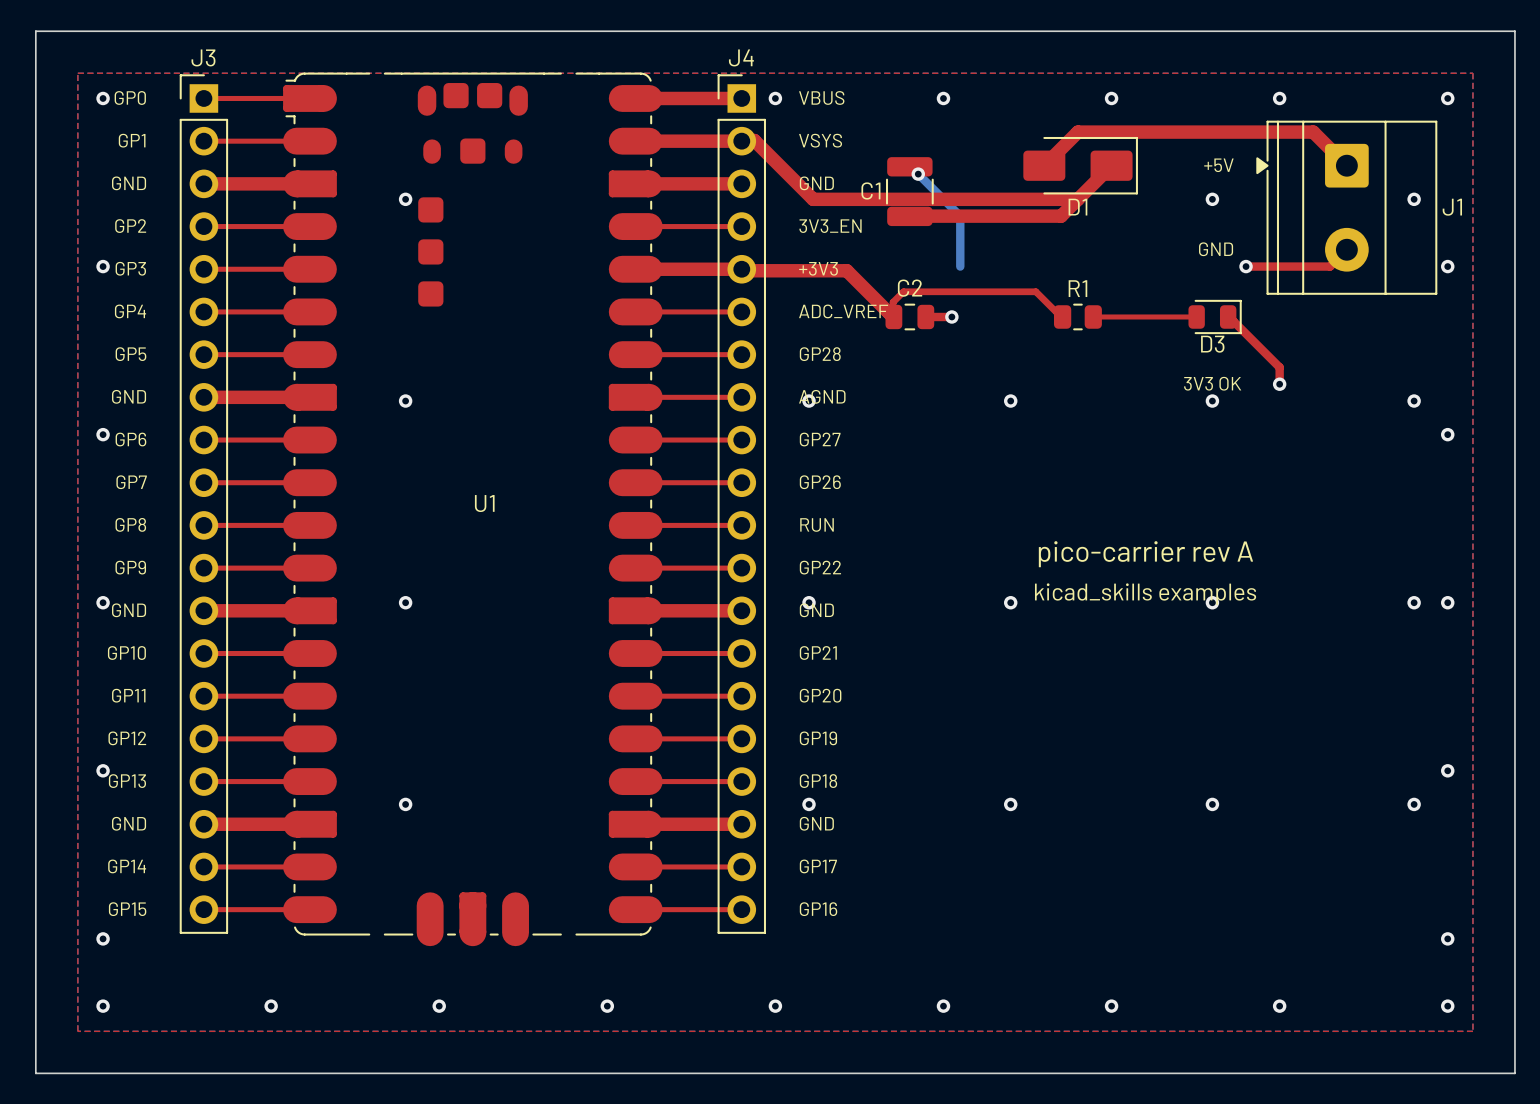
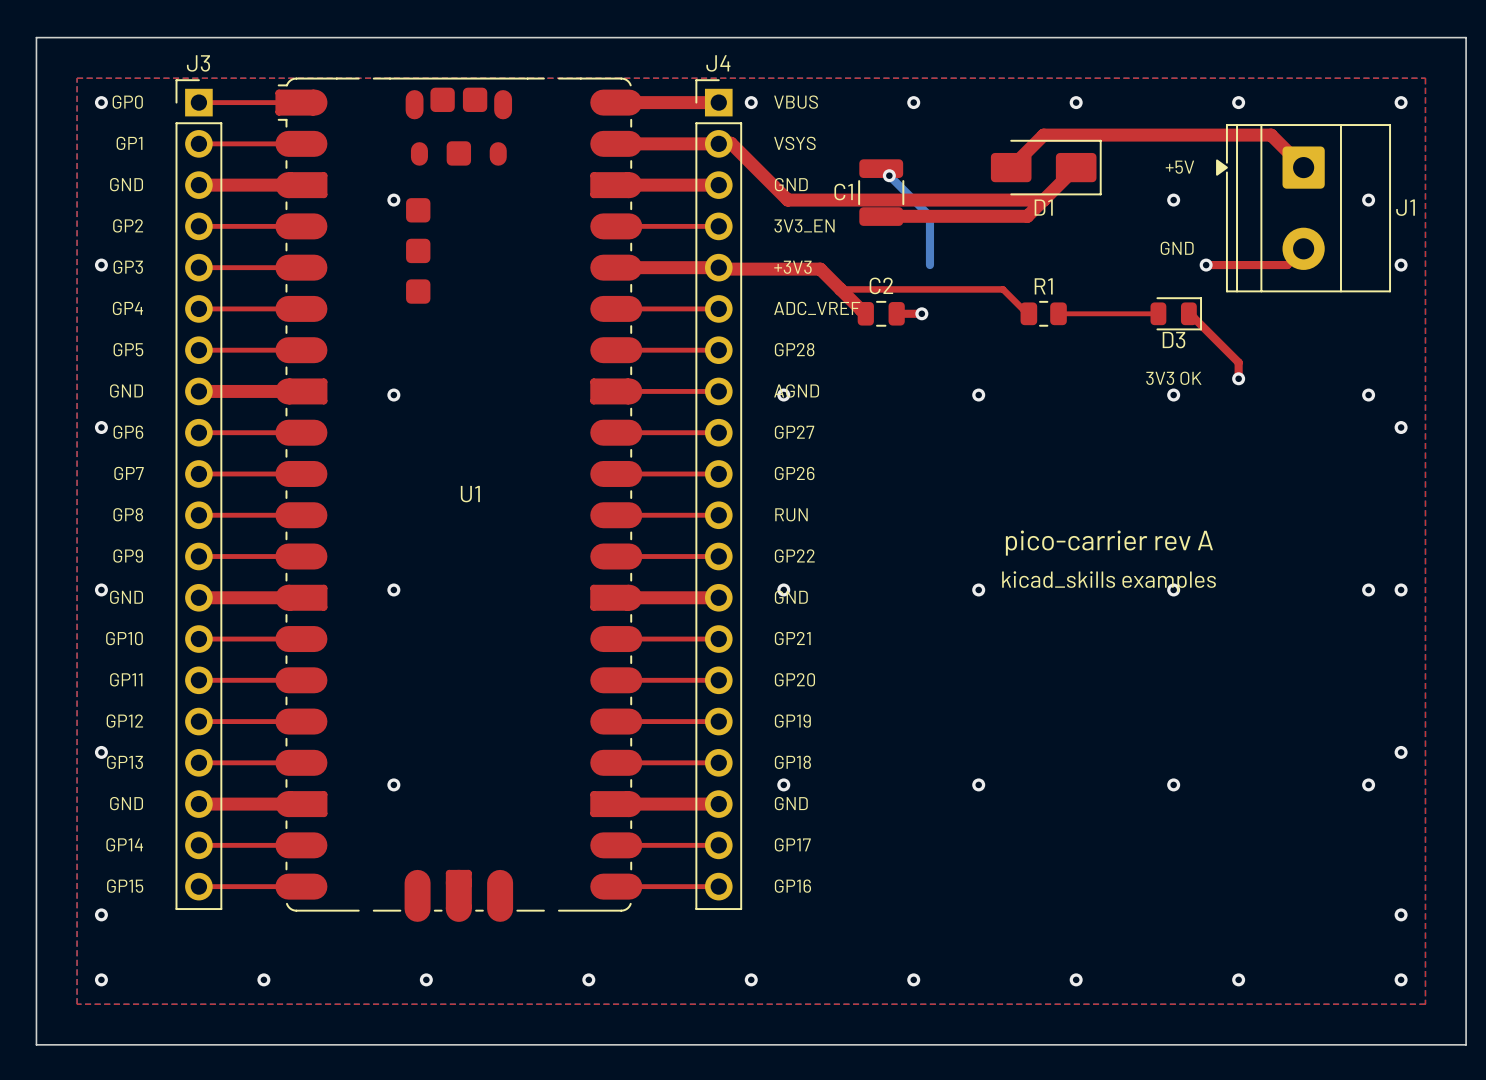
top track: (903, 291) (893, 302) (893, 316) -> (875, 289) (840, 289)

